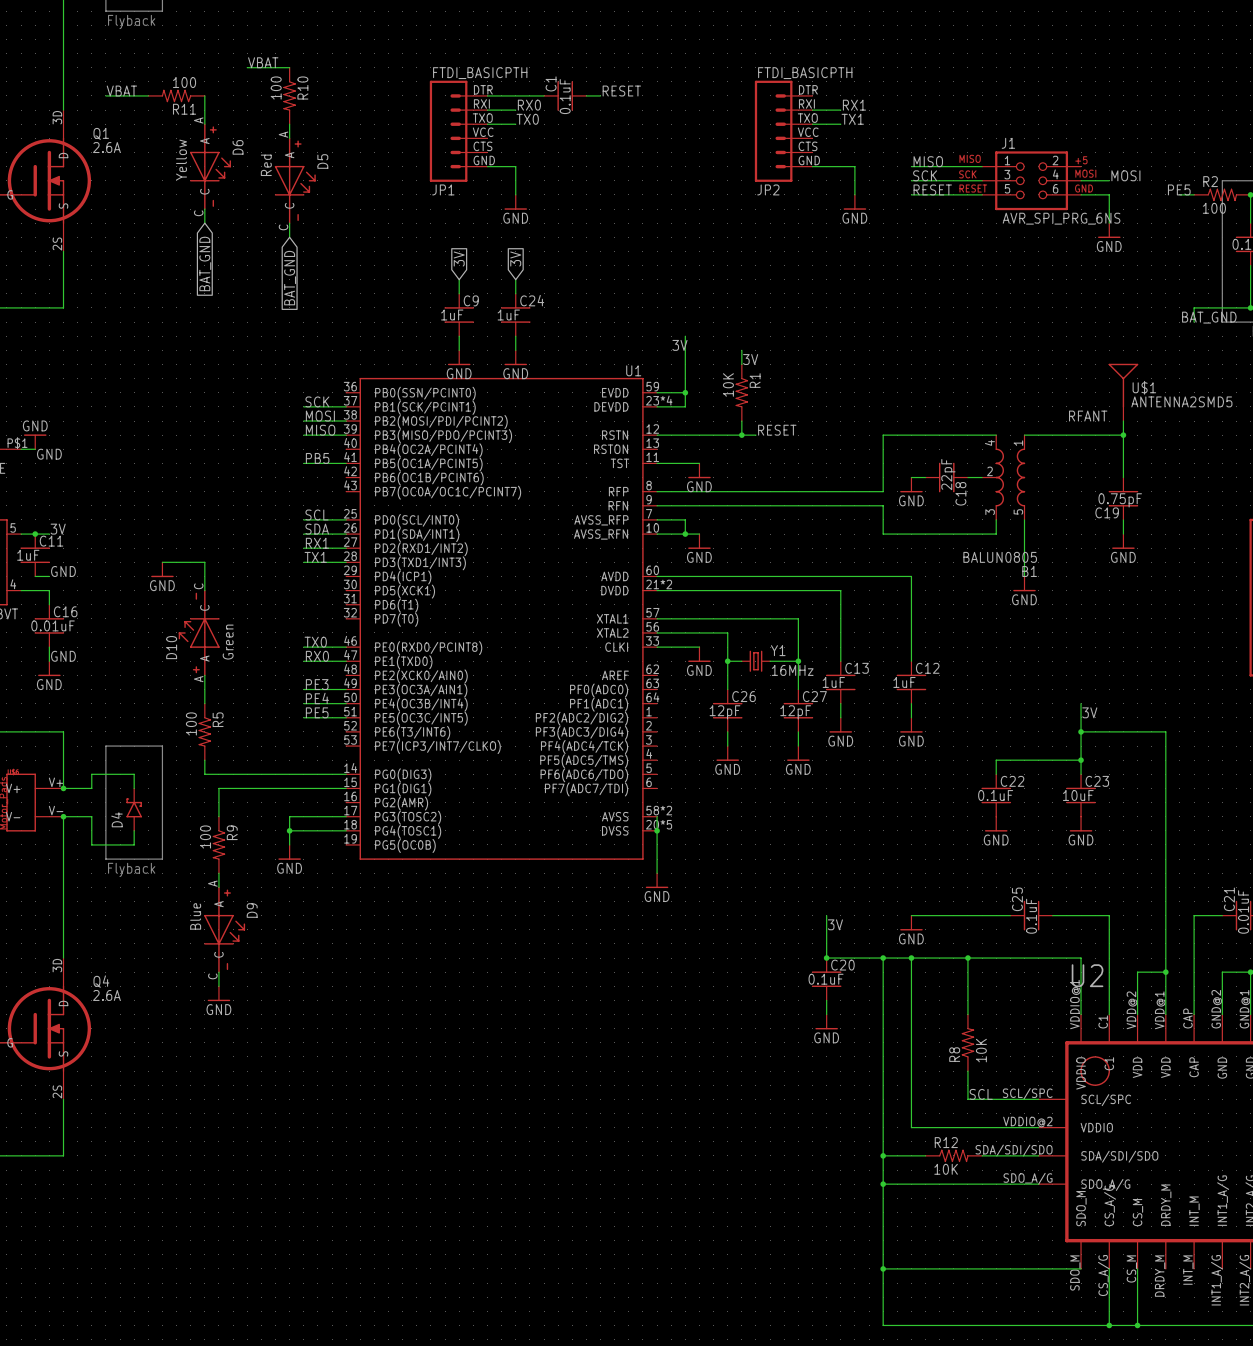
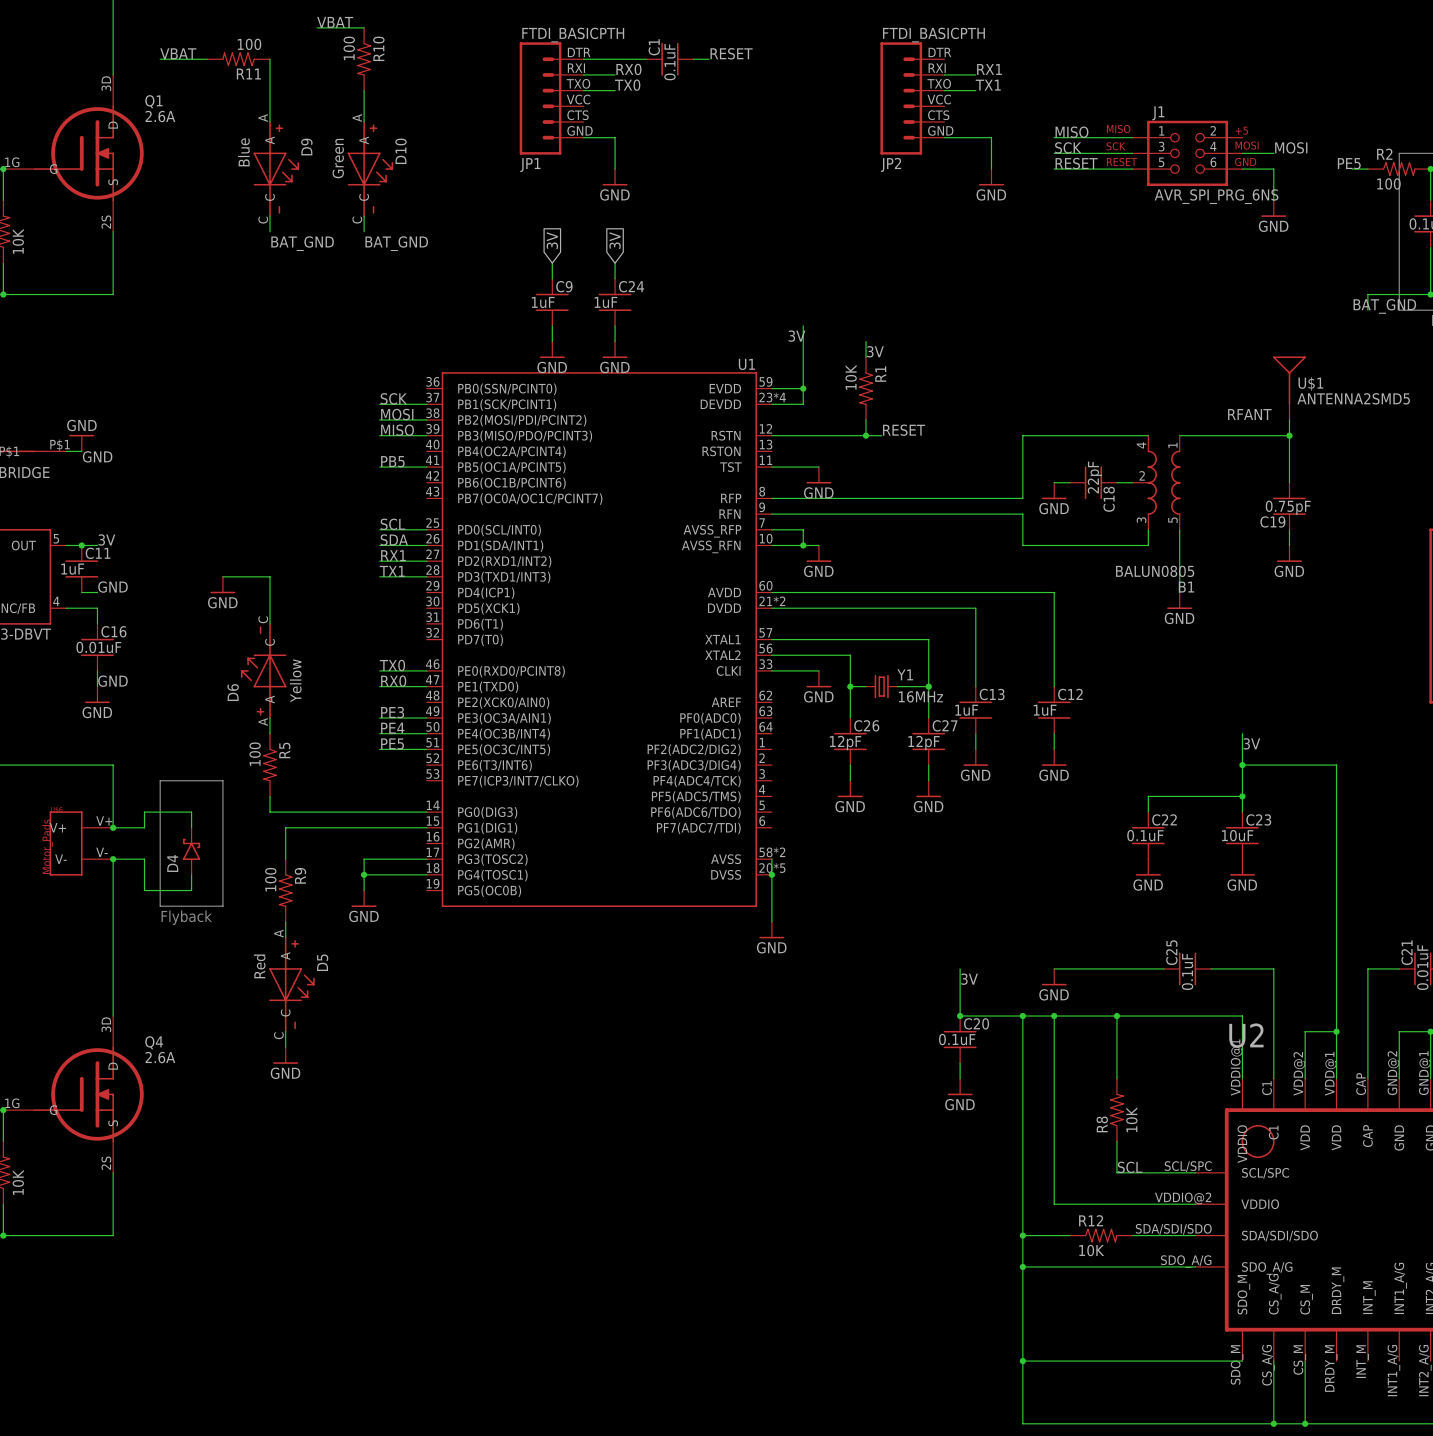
D6 rotation: 0° (210, 166) -> 180° (263, 670)
D6 position: (210, 166) -> (263, 670)
D5: Red (295, 180) -> none
D9: none -> Blue (276, 169)
label: none -> BAT_GND (302, 243)
label: none -> BAT_GND (396, 243)
global label: BAT_GND (205, 263) -> none
global label: BAT_GND (290, 278) -> none
D10 rotation: 0° (199, 632) -> 180° (370, 169)
D10 position: (199, 632) -> (370, 169)
D9 name: D9 (252, 910) -> D5 (322, 962)
D9 value: Blue (195, 916) -> Red (259, 966)

